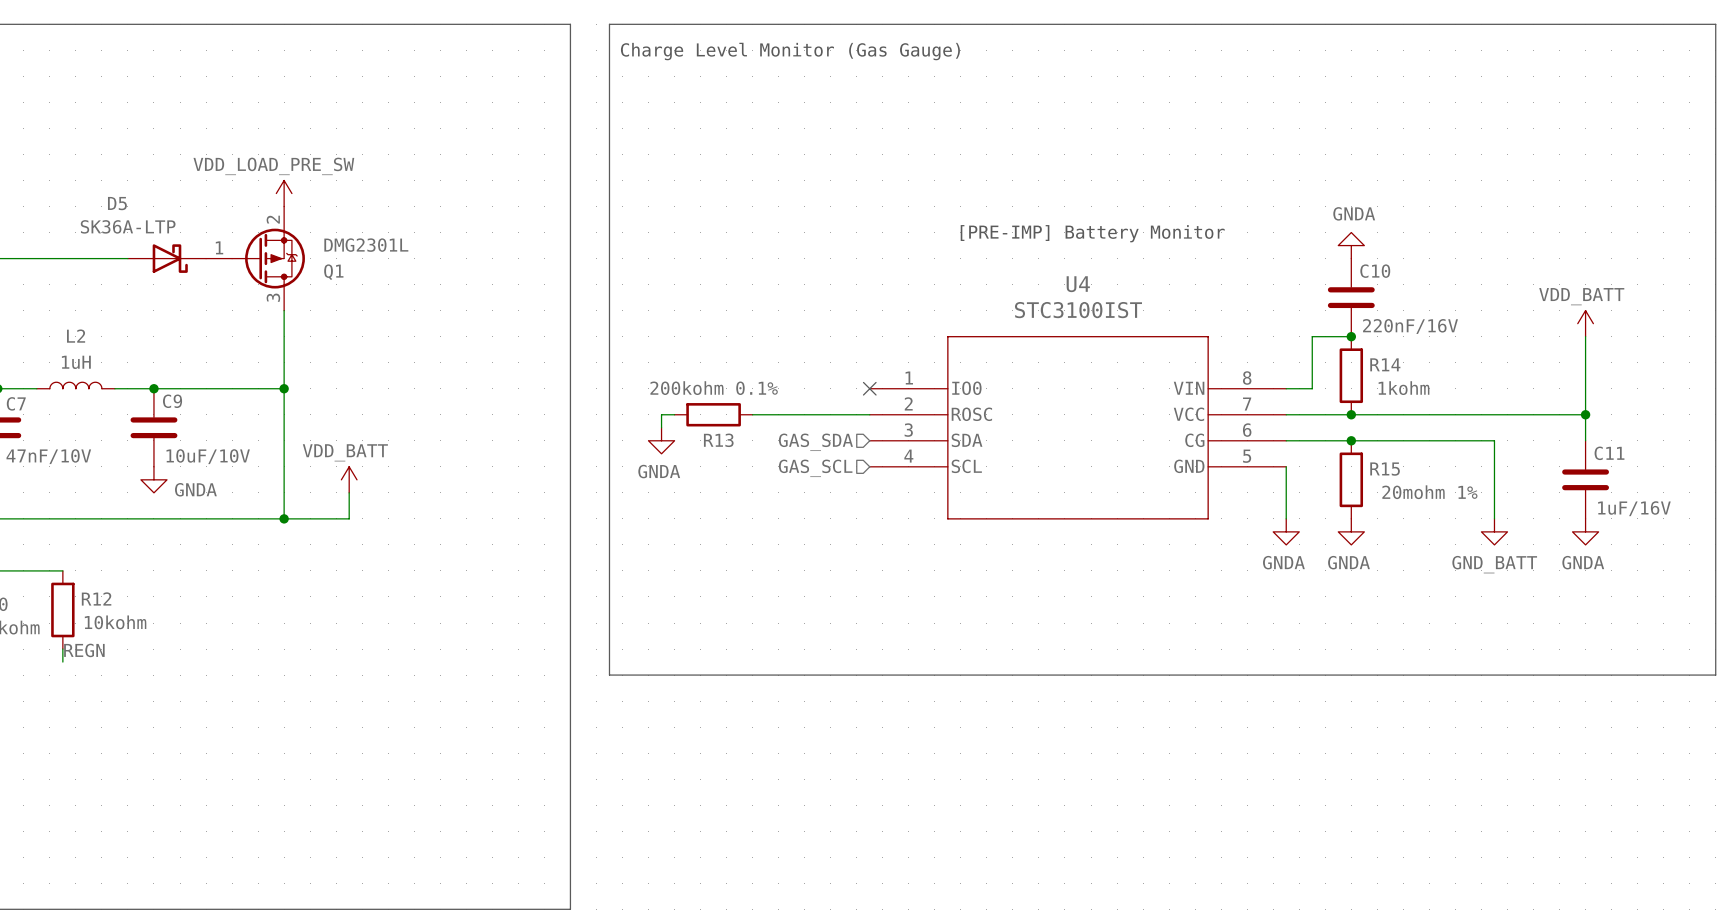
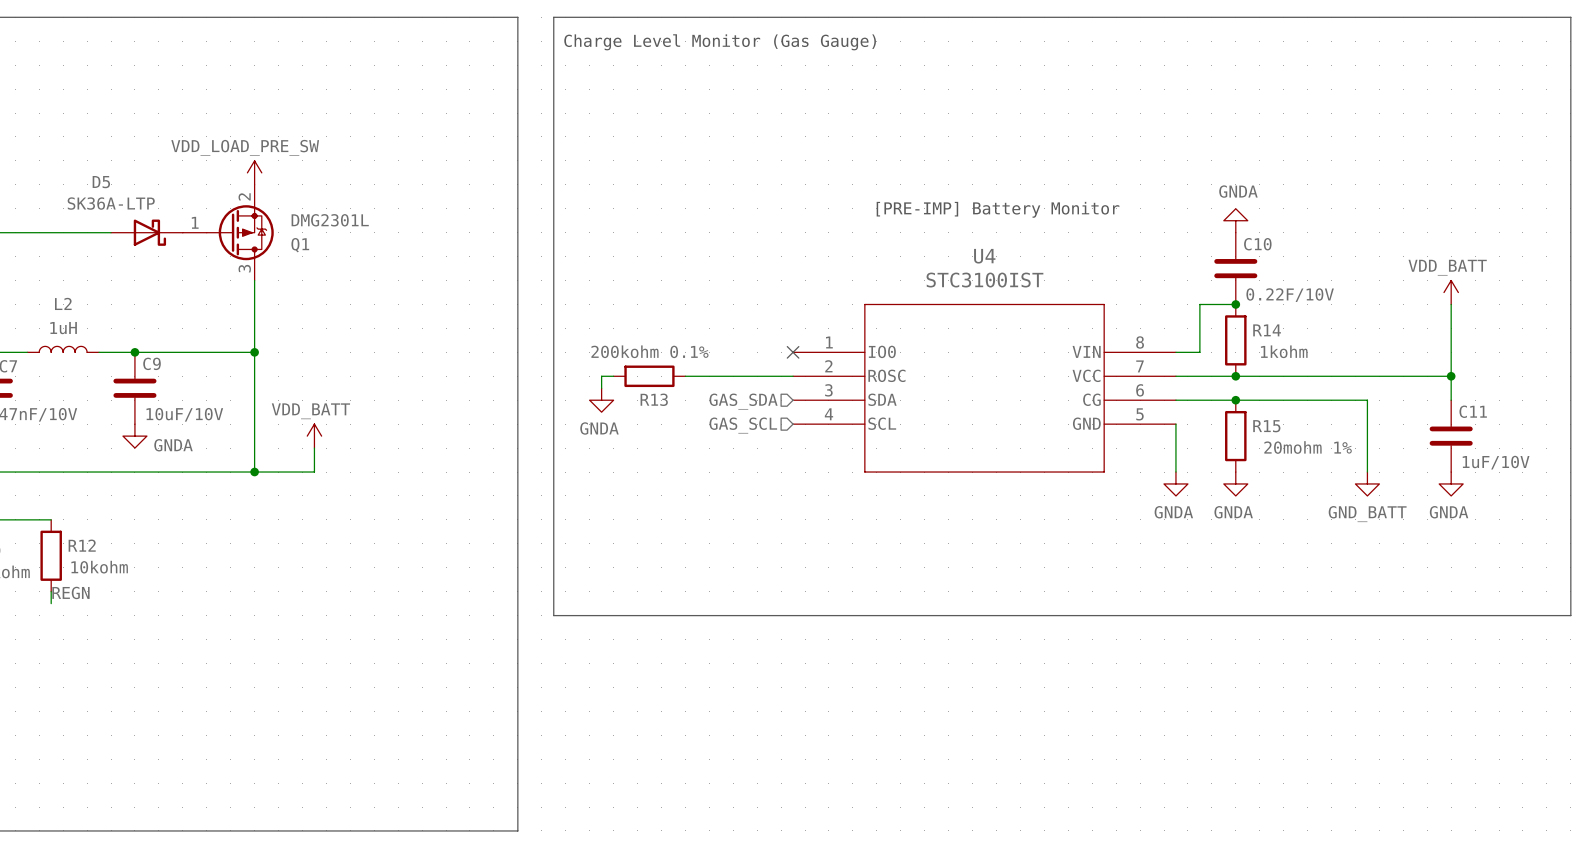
C10 value: 220nF/16V (1410, 326) -> 0.22F/10V (1290, 295)
C11 value: 1uF/16V (1634, 508) -> 1uF/10V (1496, 462)

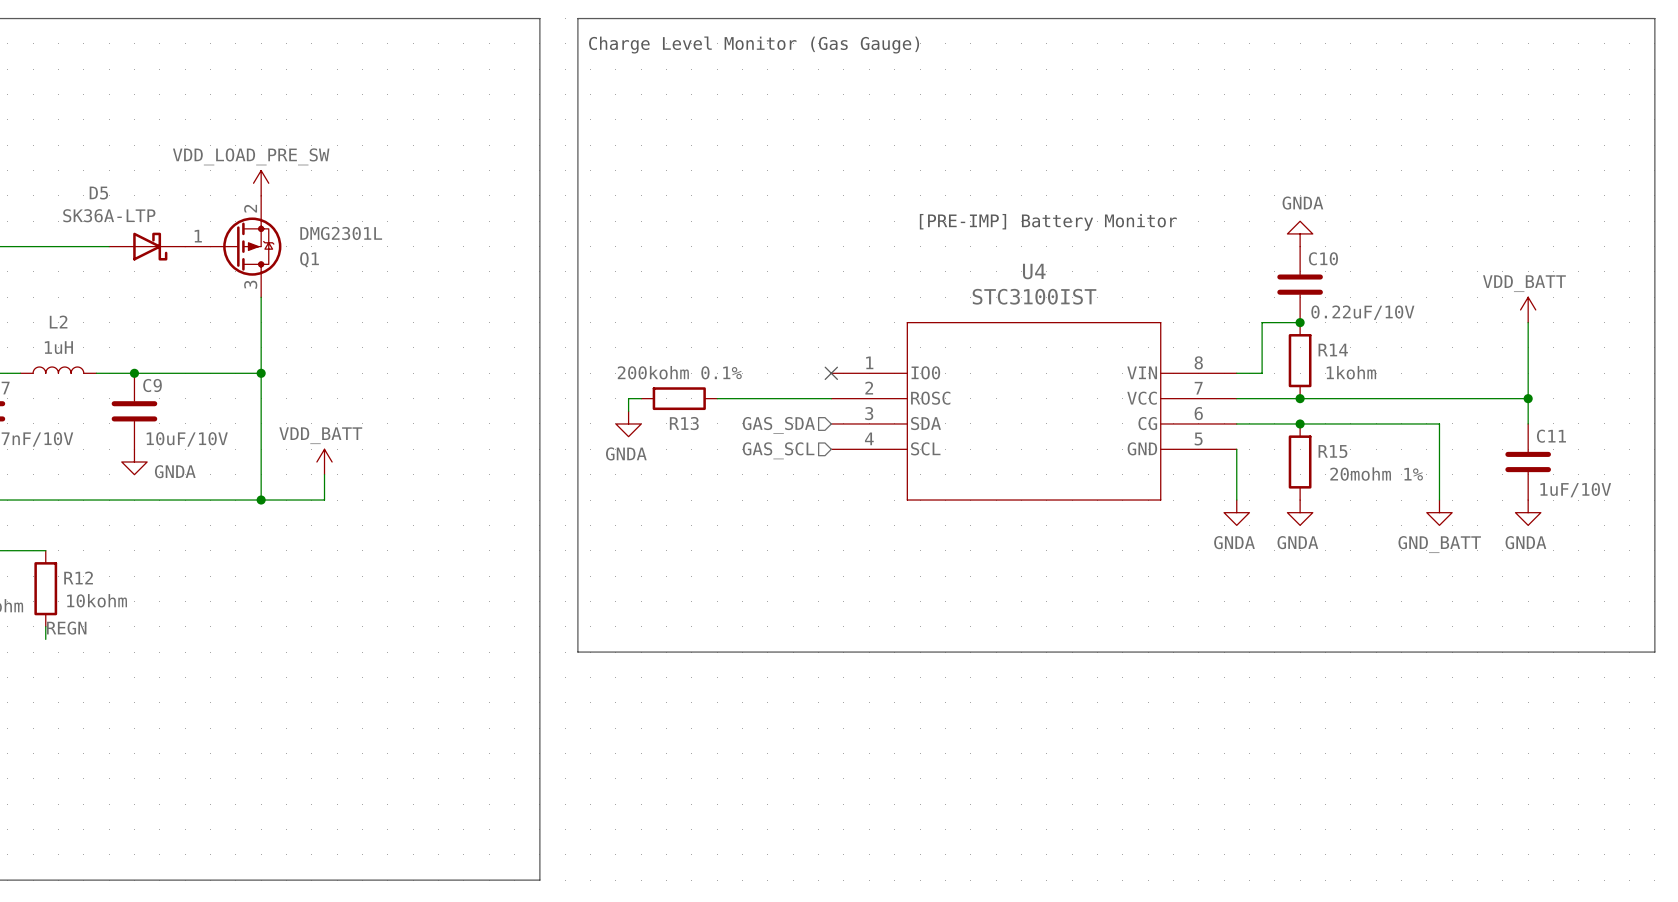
C10 value: 0.22F/10V (1290, 295) -> 0.22uF/10V (1362, 312)

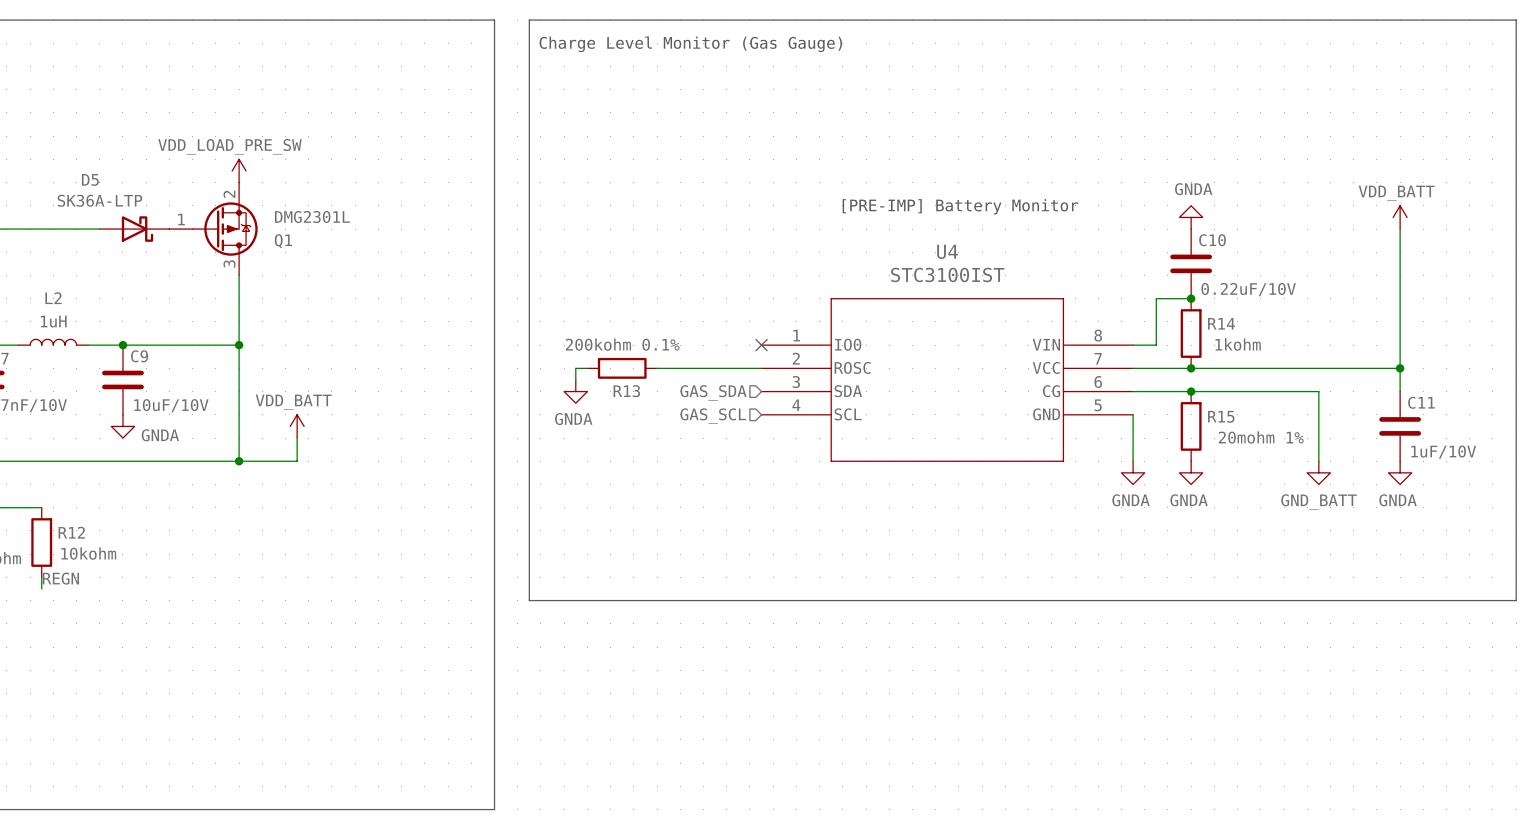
wire: none -> (1400, 229) (1400, 298)
power symbol position: VDD_BATT (1528, 309) -> VDD_BATT (1400, 217)

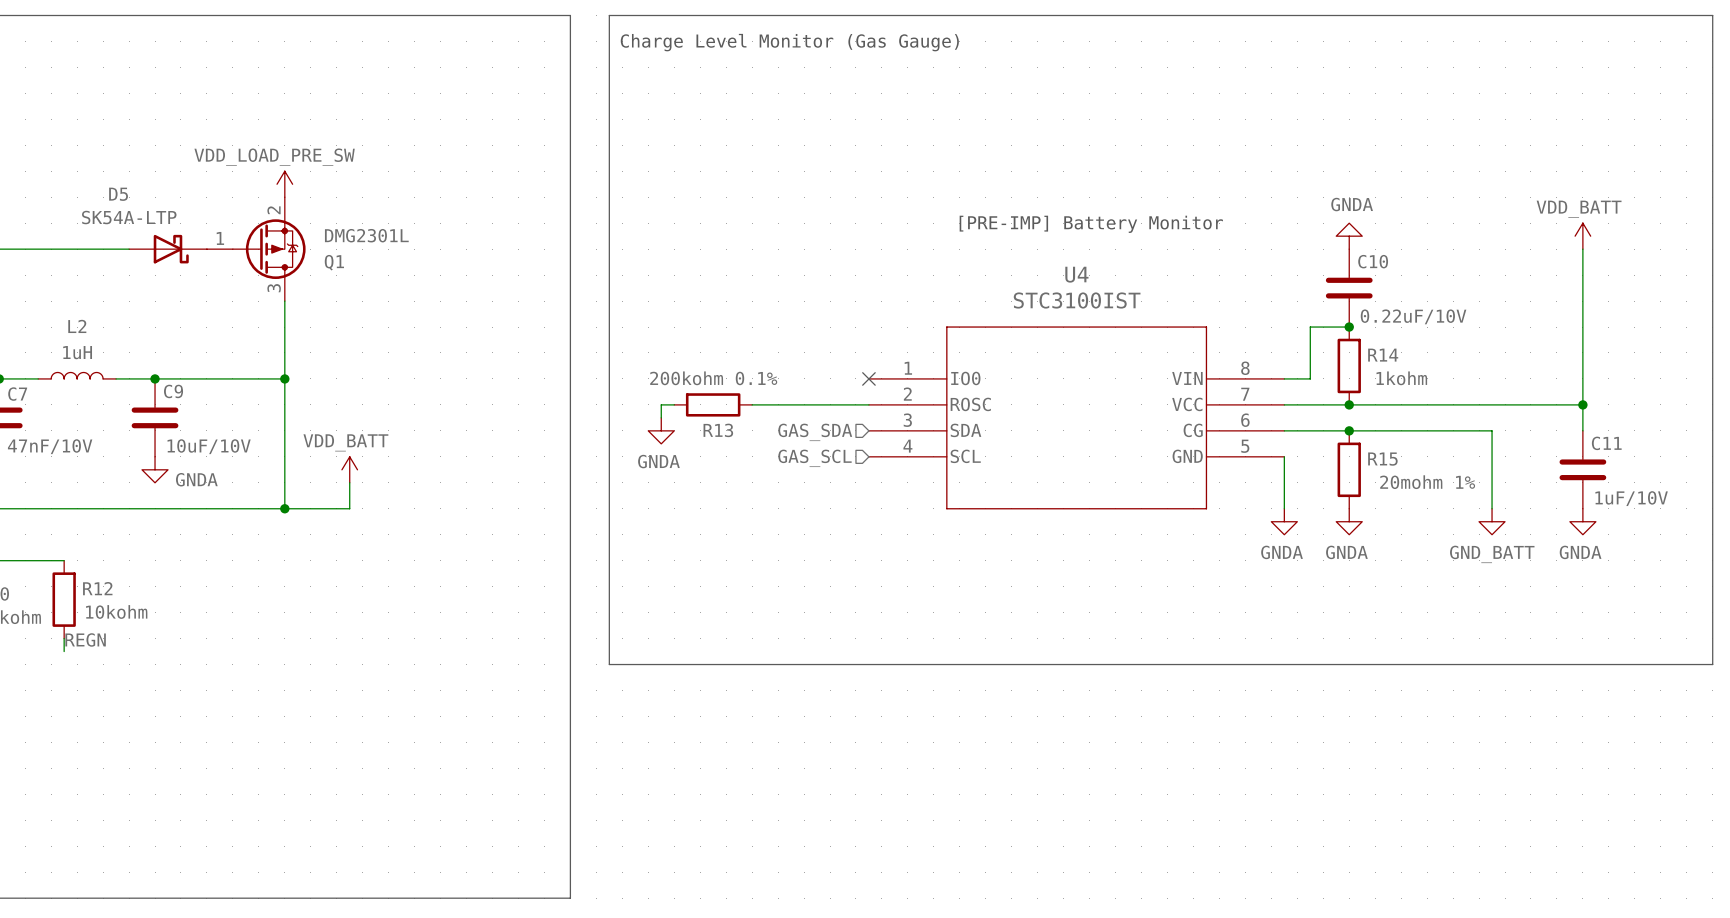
D5 value: SK36A-LTP (99, 200) -> SK54A-LTP (129, 217)

